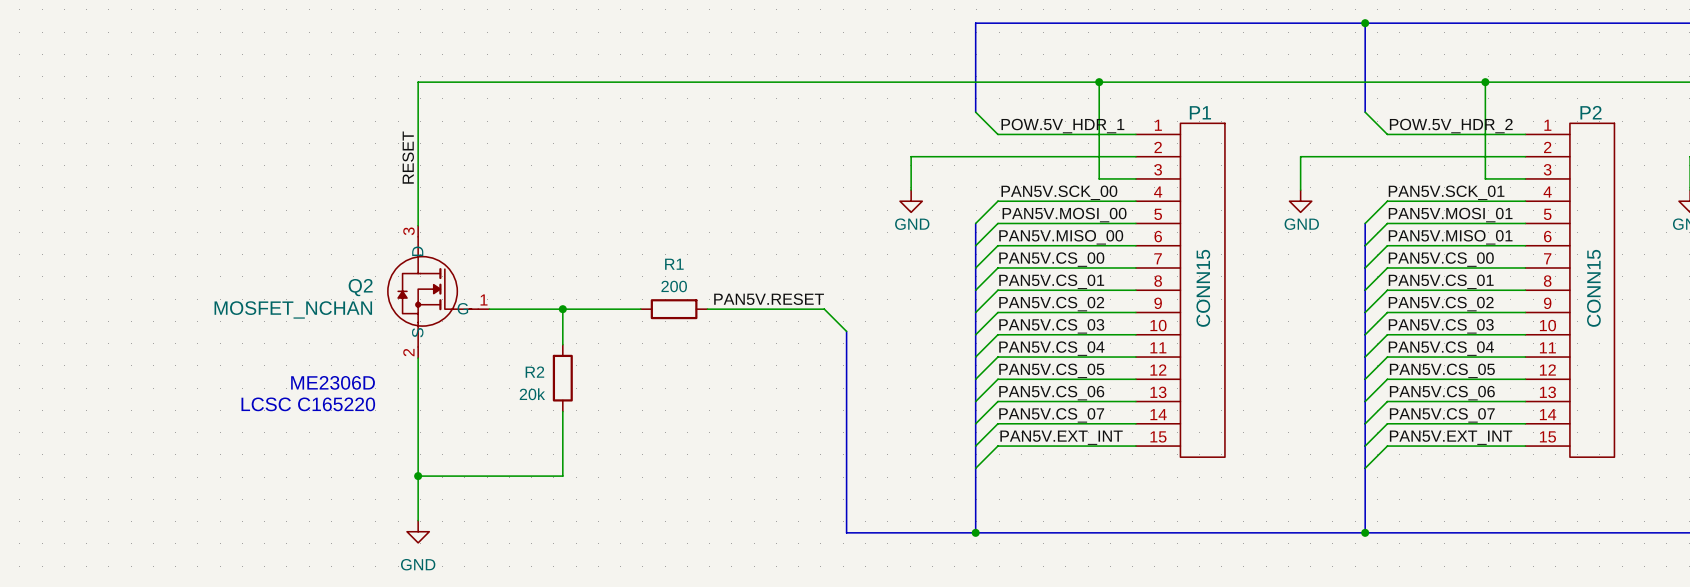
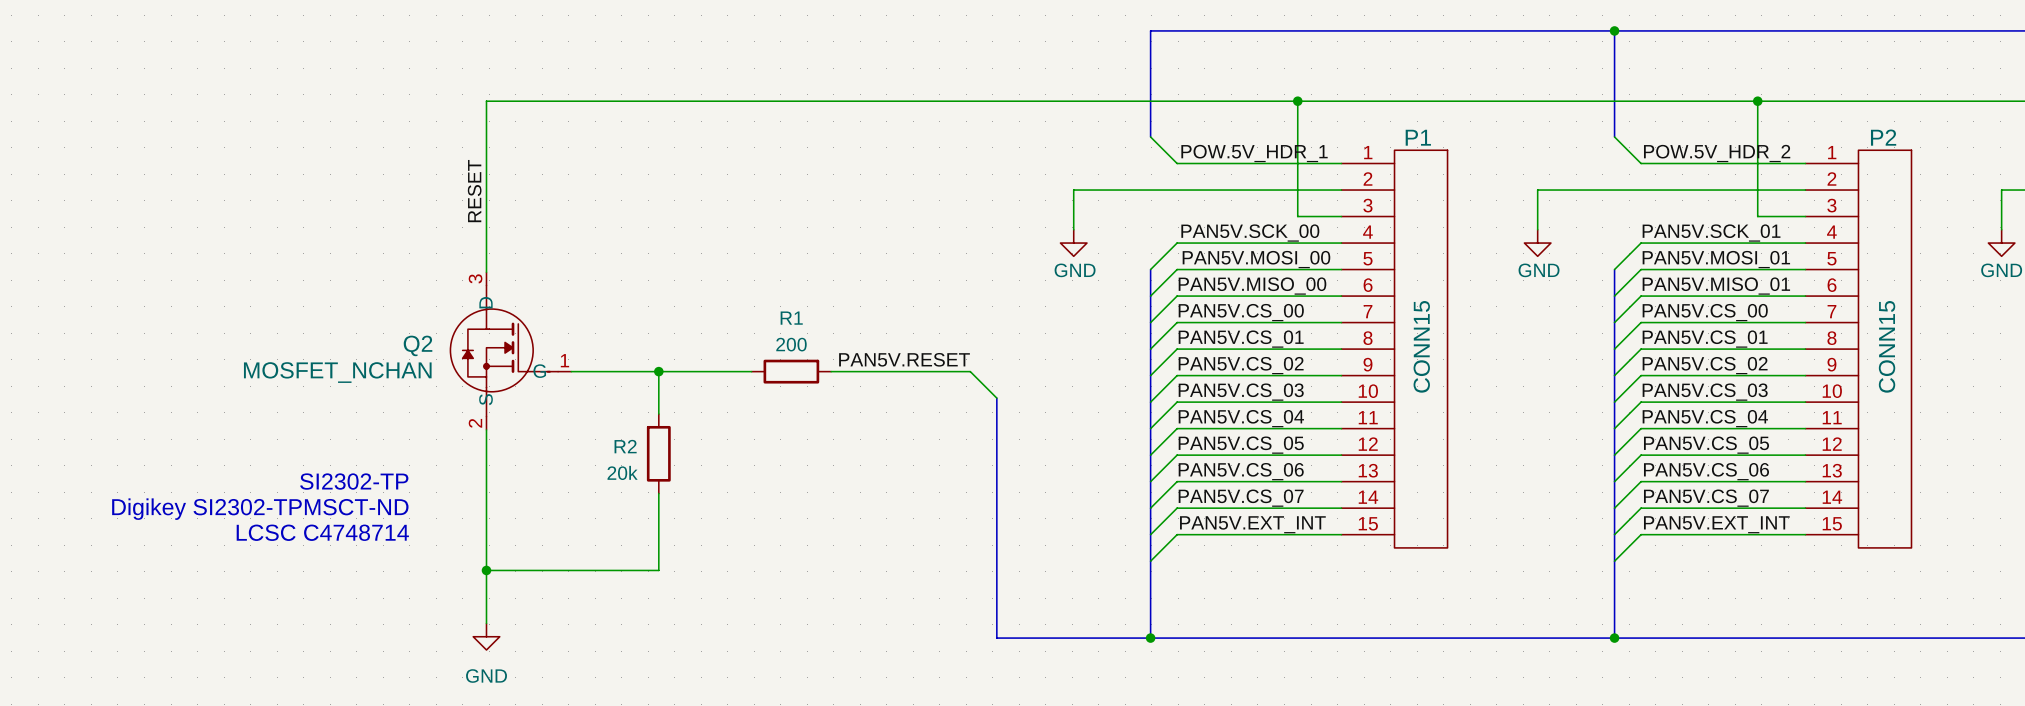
text: ME2306D (333, 382) -> none
text: none -> SI2302-TP (354, 481)
text: LCSC C165220 (308, 404) -> none
text: none -> Digikey SI2302-TPMSCT-ND (260, 509)
text: none -> LCSC C4748714 (322, 532)

